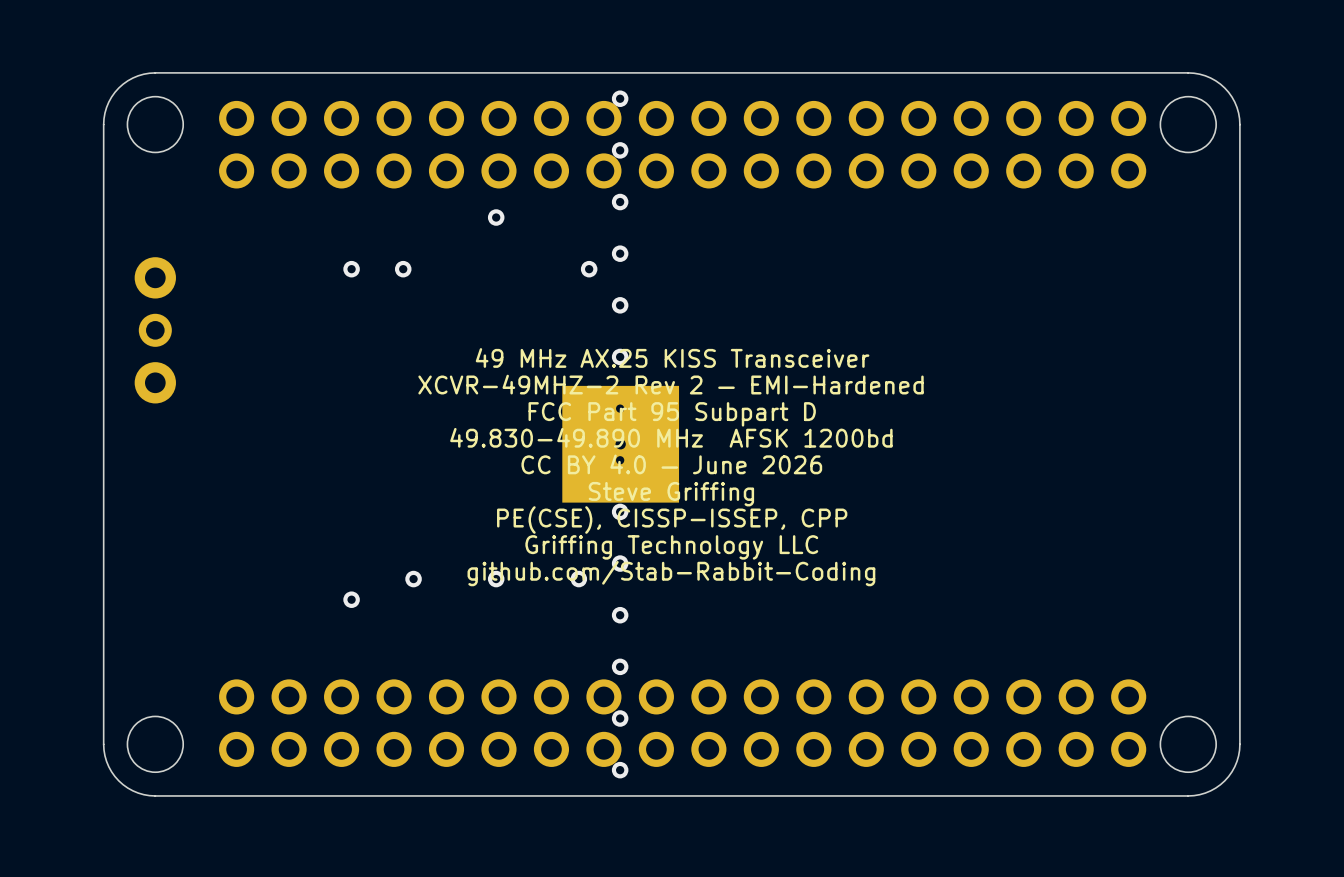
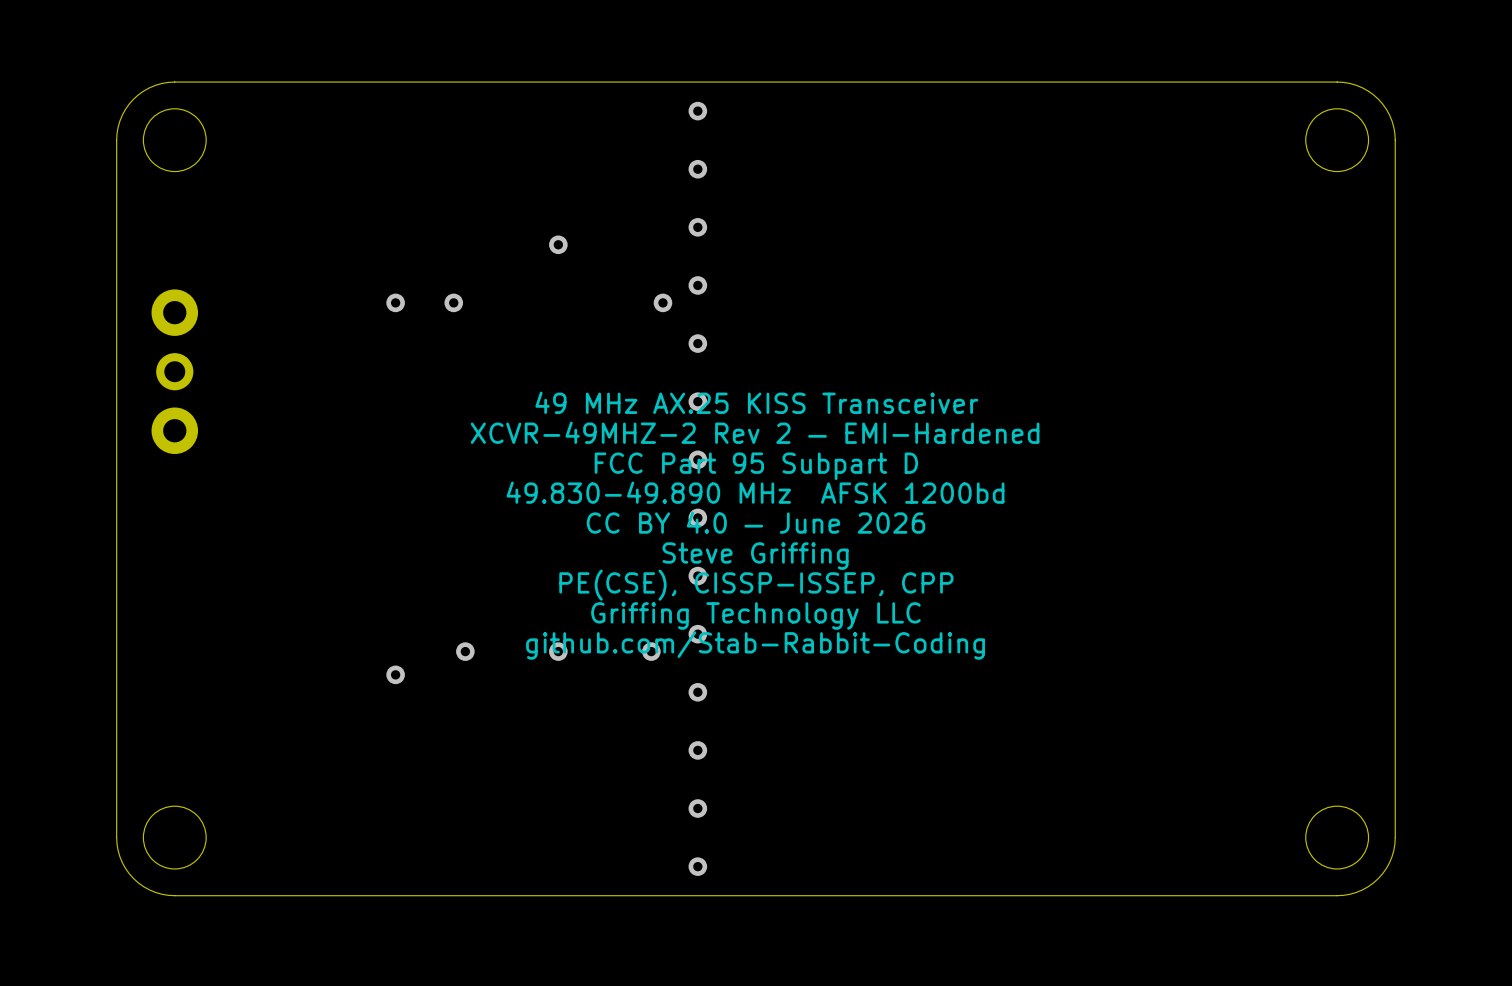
part: (682, 144) -> none
part: (620, 444) -> none
part: (682, 723) -> none

